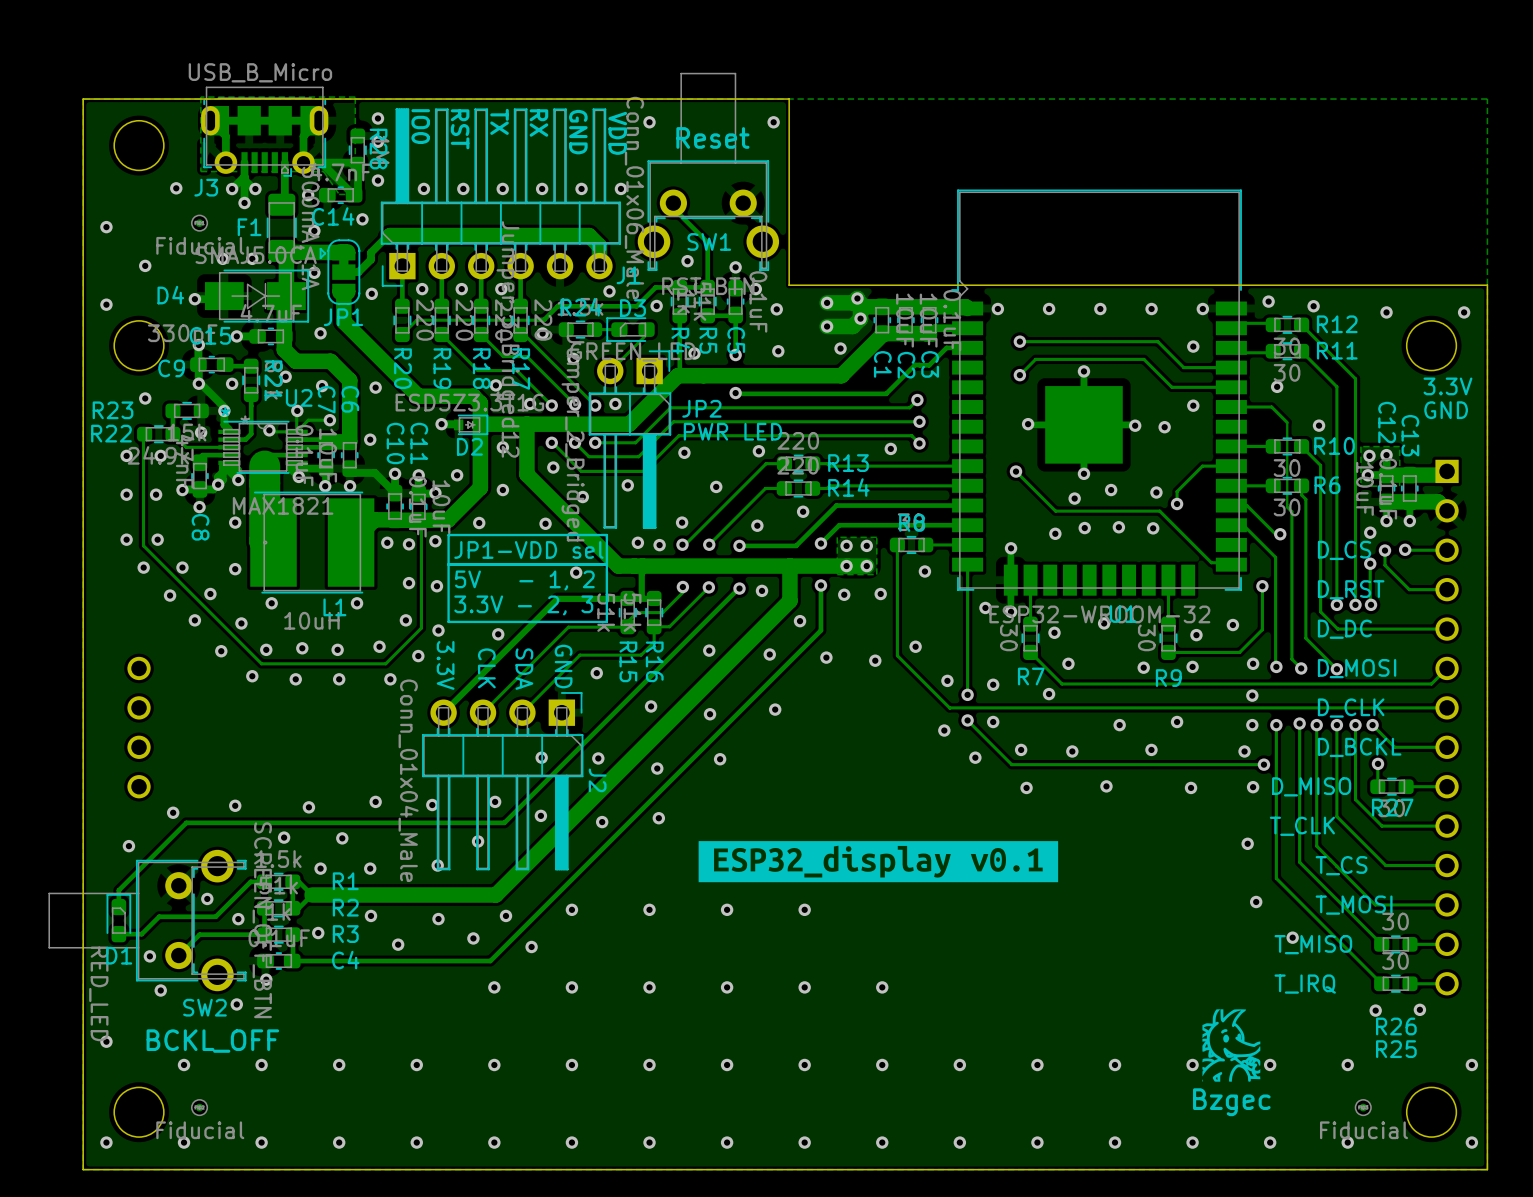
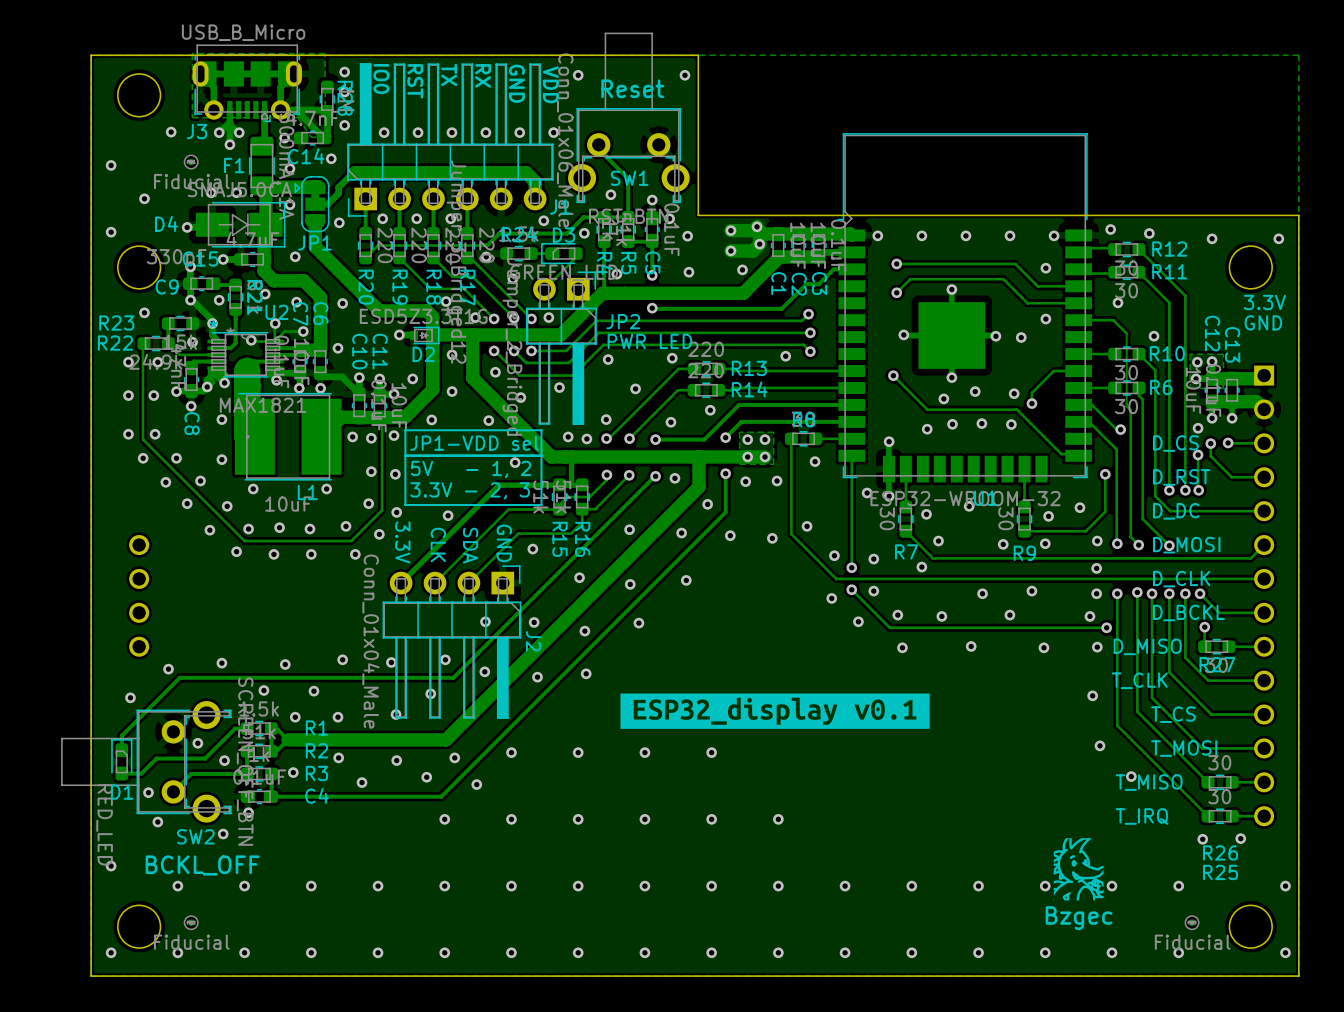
L1 value: 10uH (311, 620) -> 10uF (288, 504)

